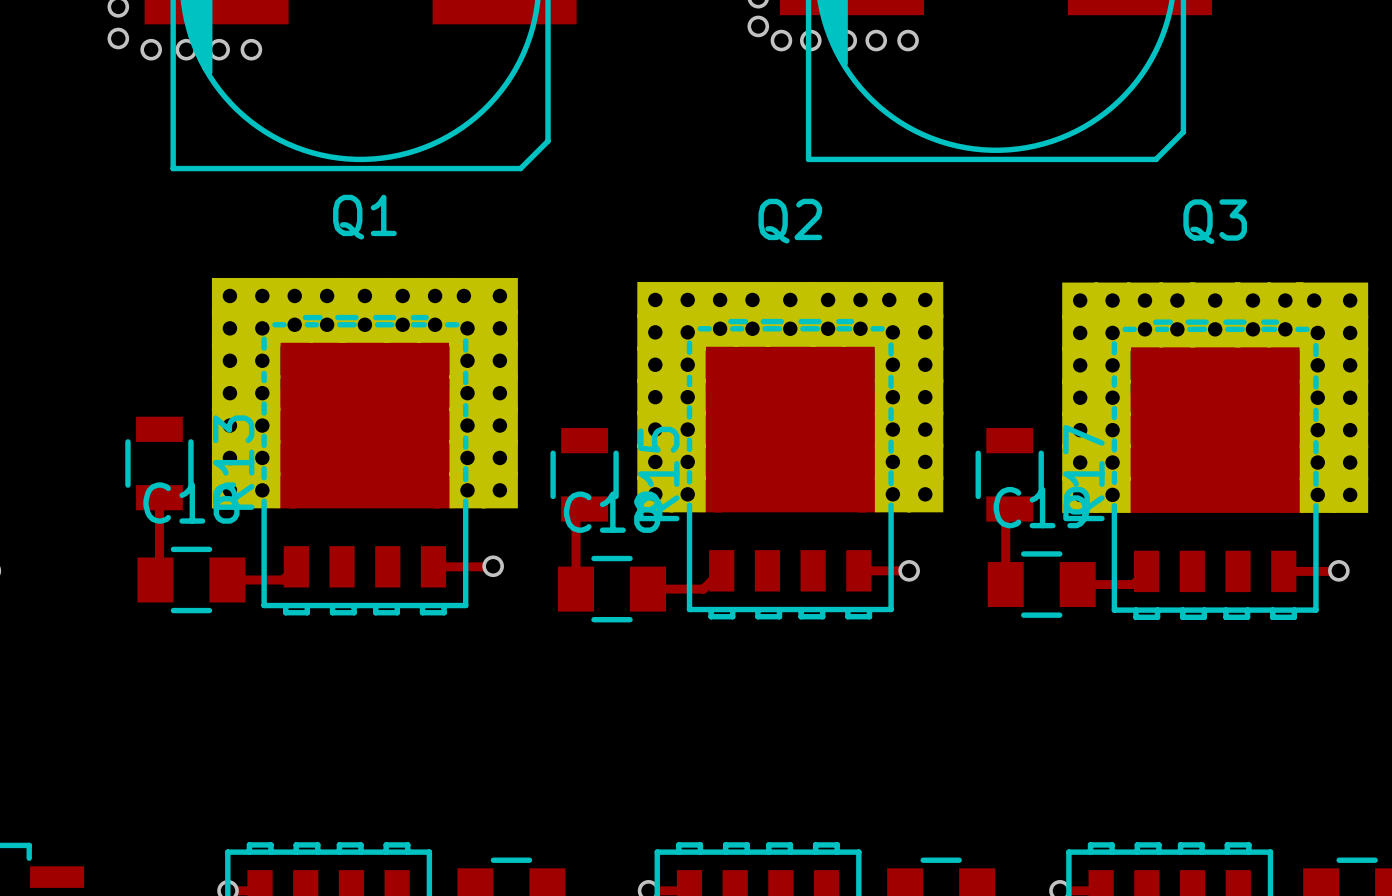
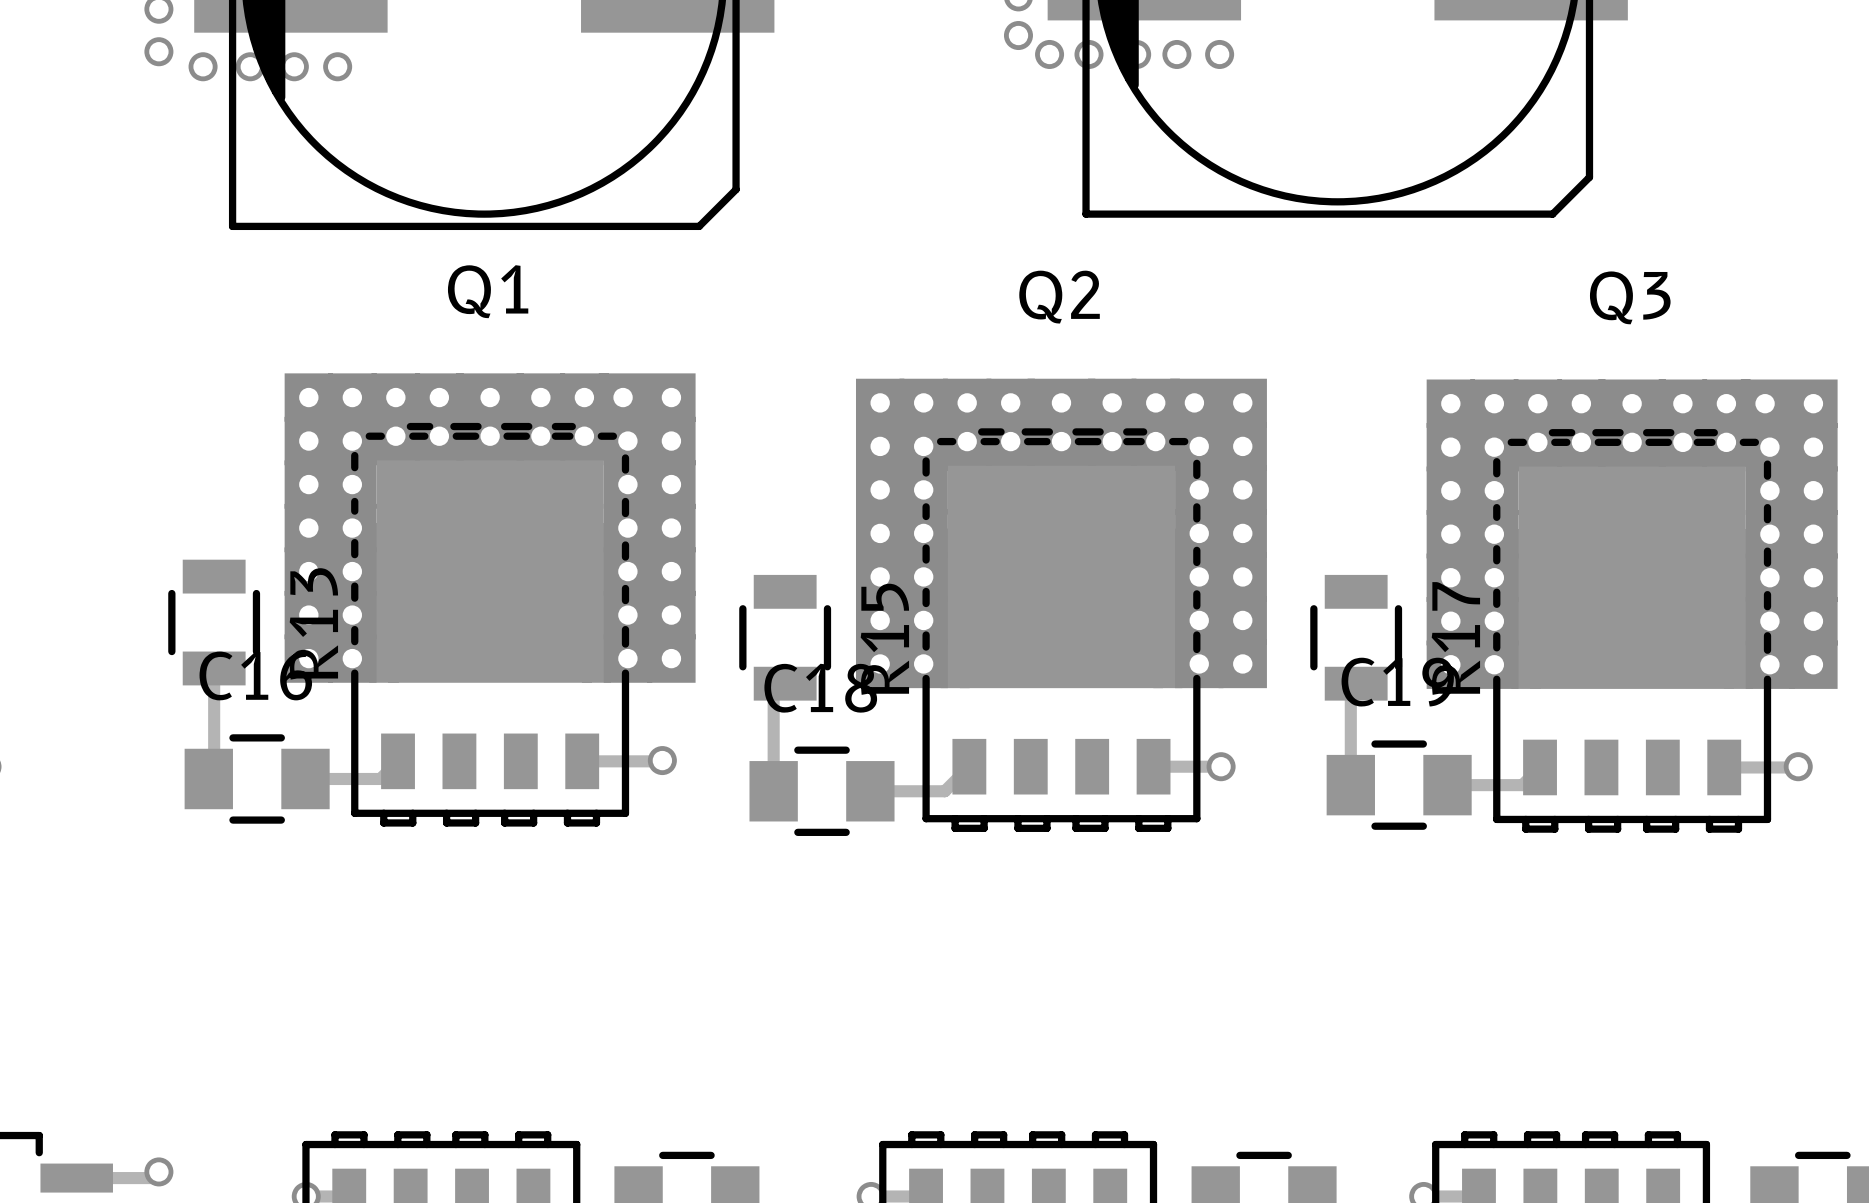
track: none -> (158, 1171) (152, 1178) (98, 1178)
via: none -> (158, 1171)

